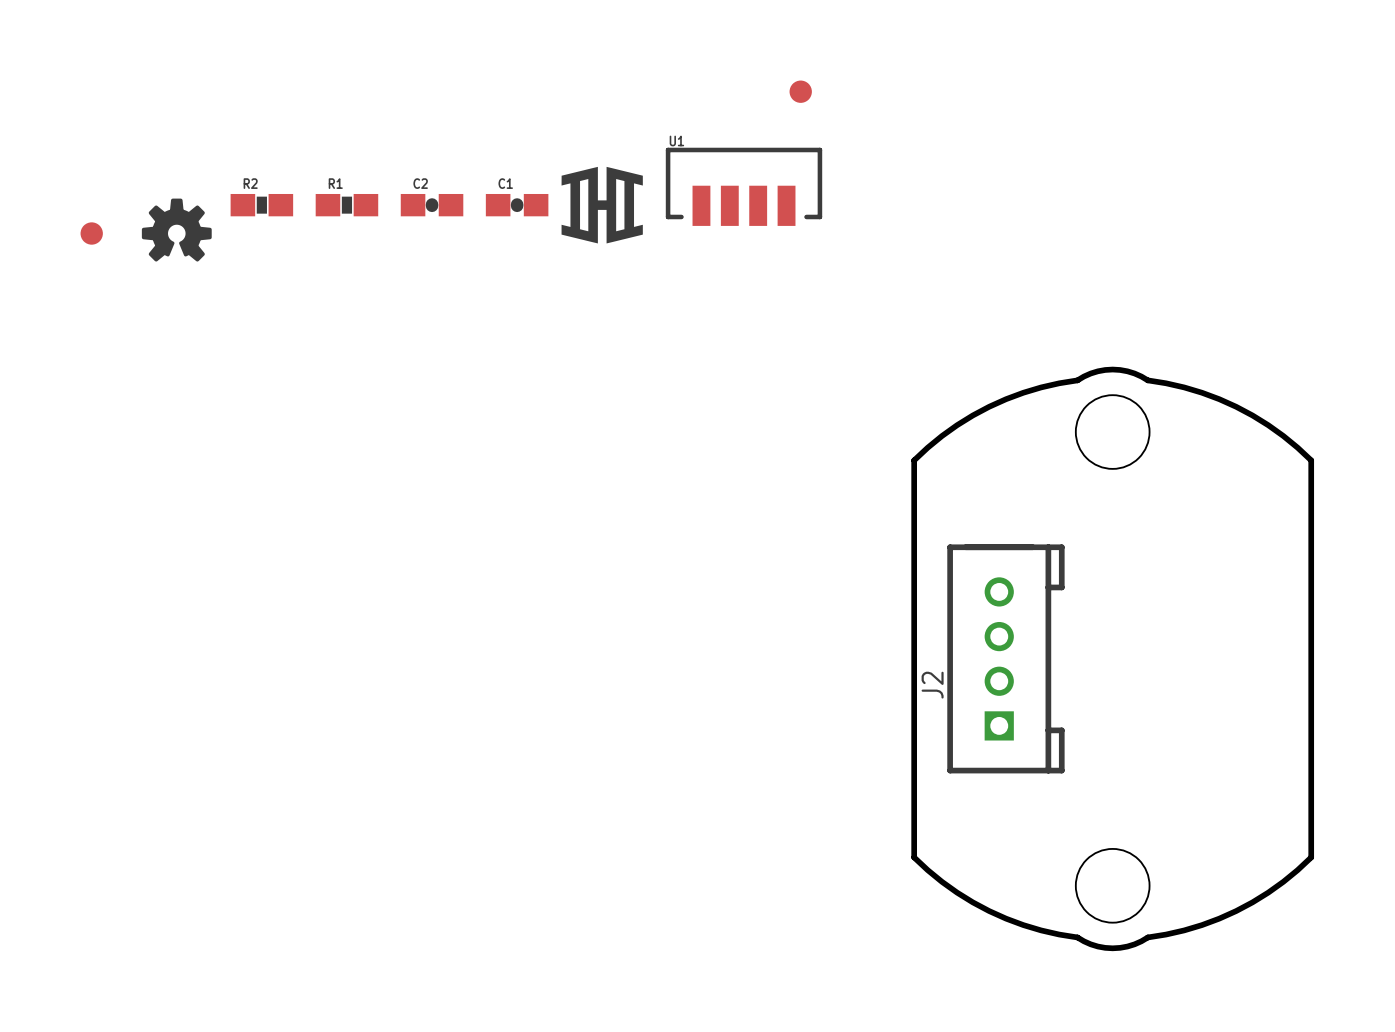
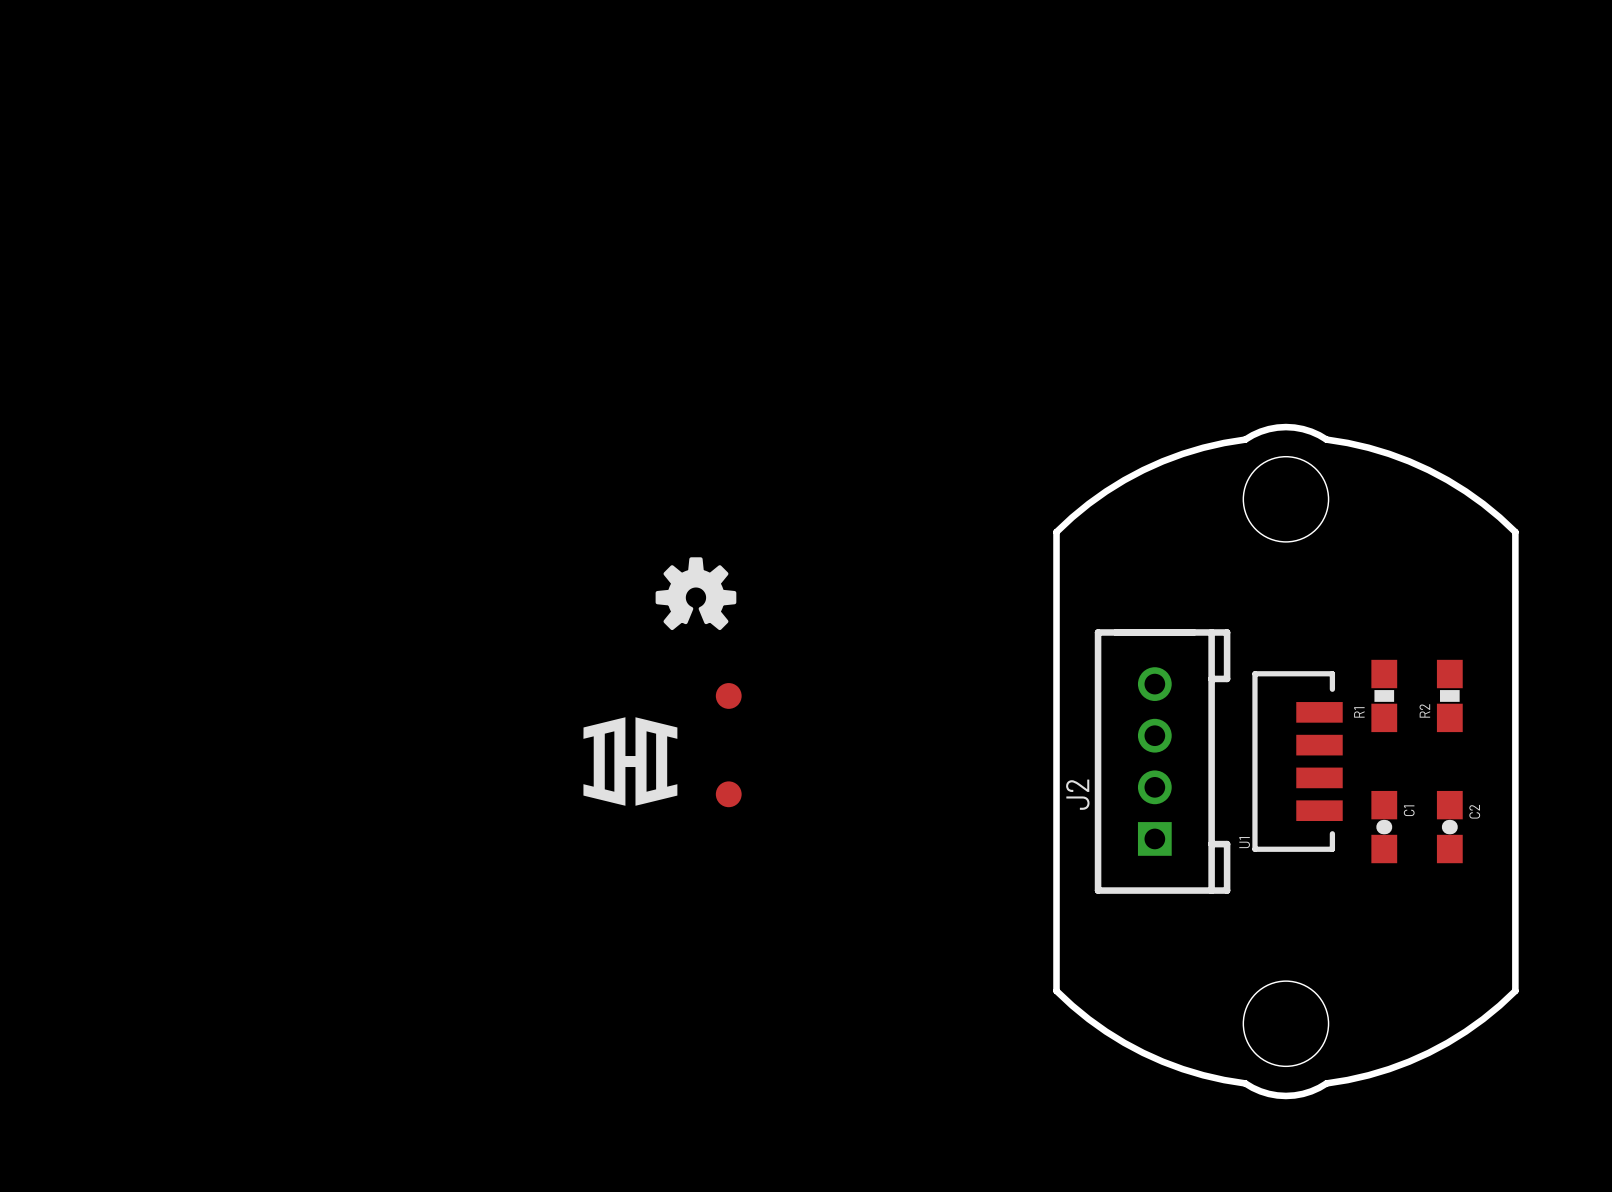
part: (800, 91) -> none
U1 rotation: 0° (744, 186) -> 90° counterclockwise (1297, 761)
U1 position: (744, 186) -> (1297, 761)
R2 rotation: 0° (261, 205) -> 90° clockwise (1449, 695)
R2 position: (261, 205) -> (1449, 695)
R1 rotation: 0° (346, 205) -> 90° clockwise (1384, 695)
R1 position: (346, 205) -> (1384, 695)
C2 rotation: 0° (432, 205) -> 90° clockwise (1449, 827)
C2 position: (432, 205) -> (1449, 827)
C1 rotation: 0° (517, 205) -> 90° clockwise (1384, 827)
C1 position: (517, 205) -> (1384, 827)
drawing position: (602, 205) -> (630, 761)
drawing position: (176, 230) -> (695, 593)
part: (91, 233) -> none
part: none -> (728, 695)
part: none -> (728, 794)

